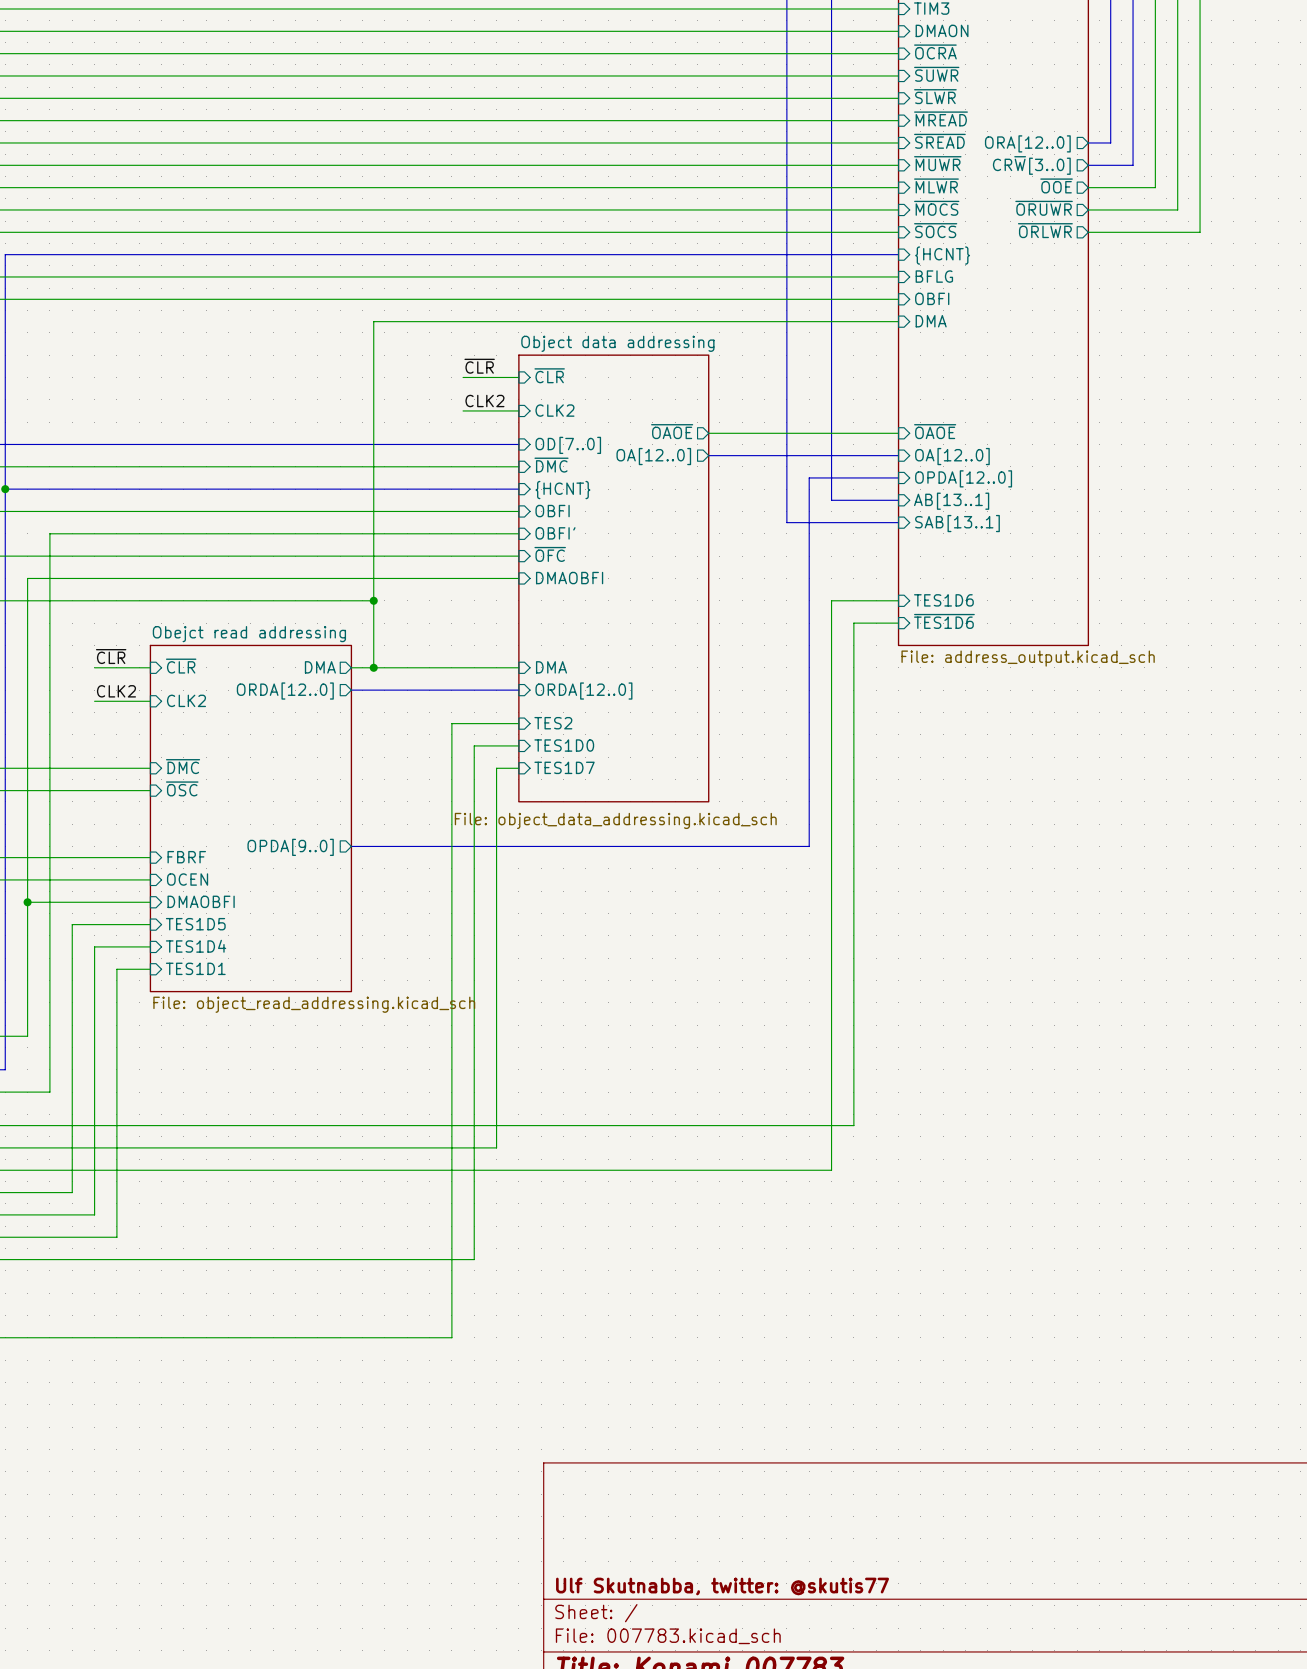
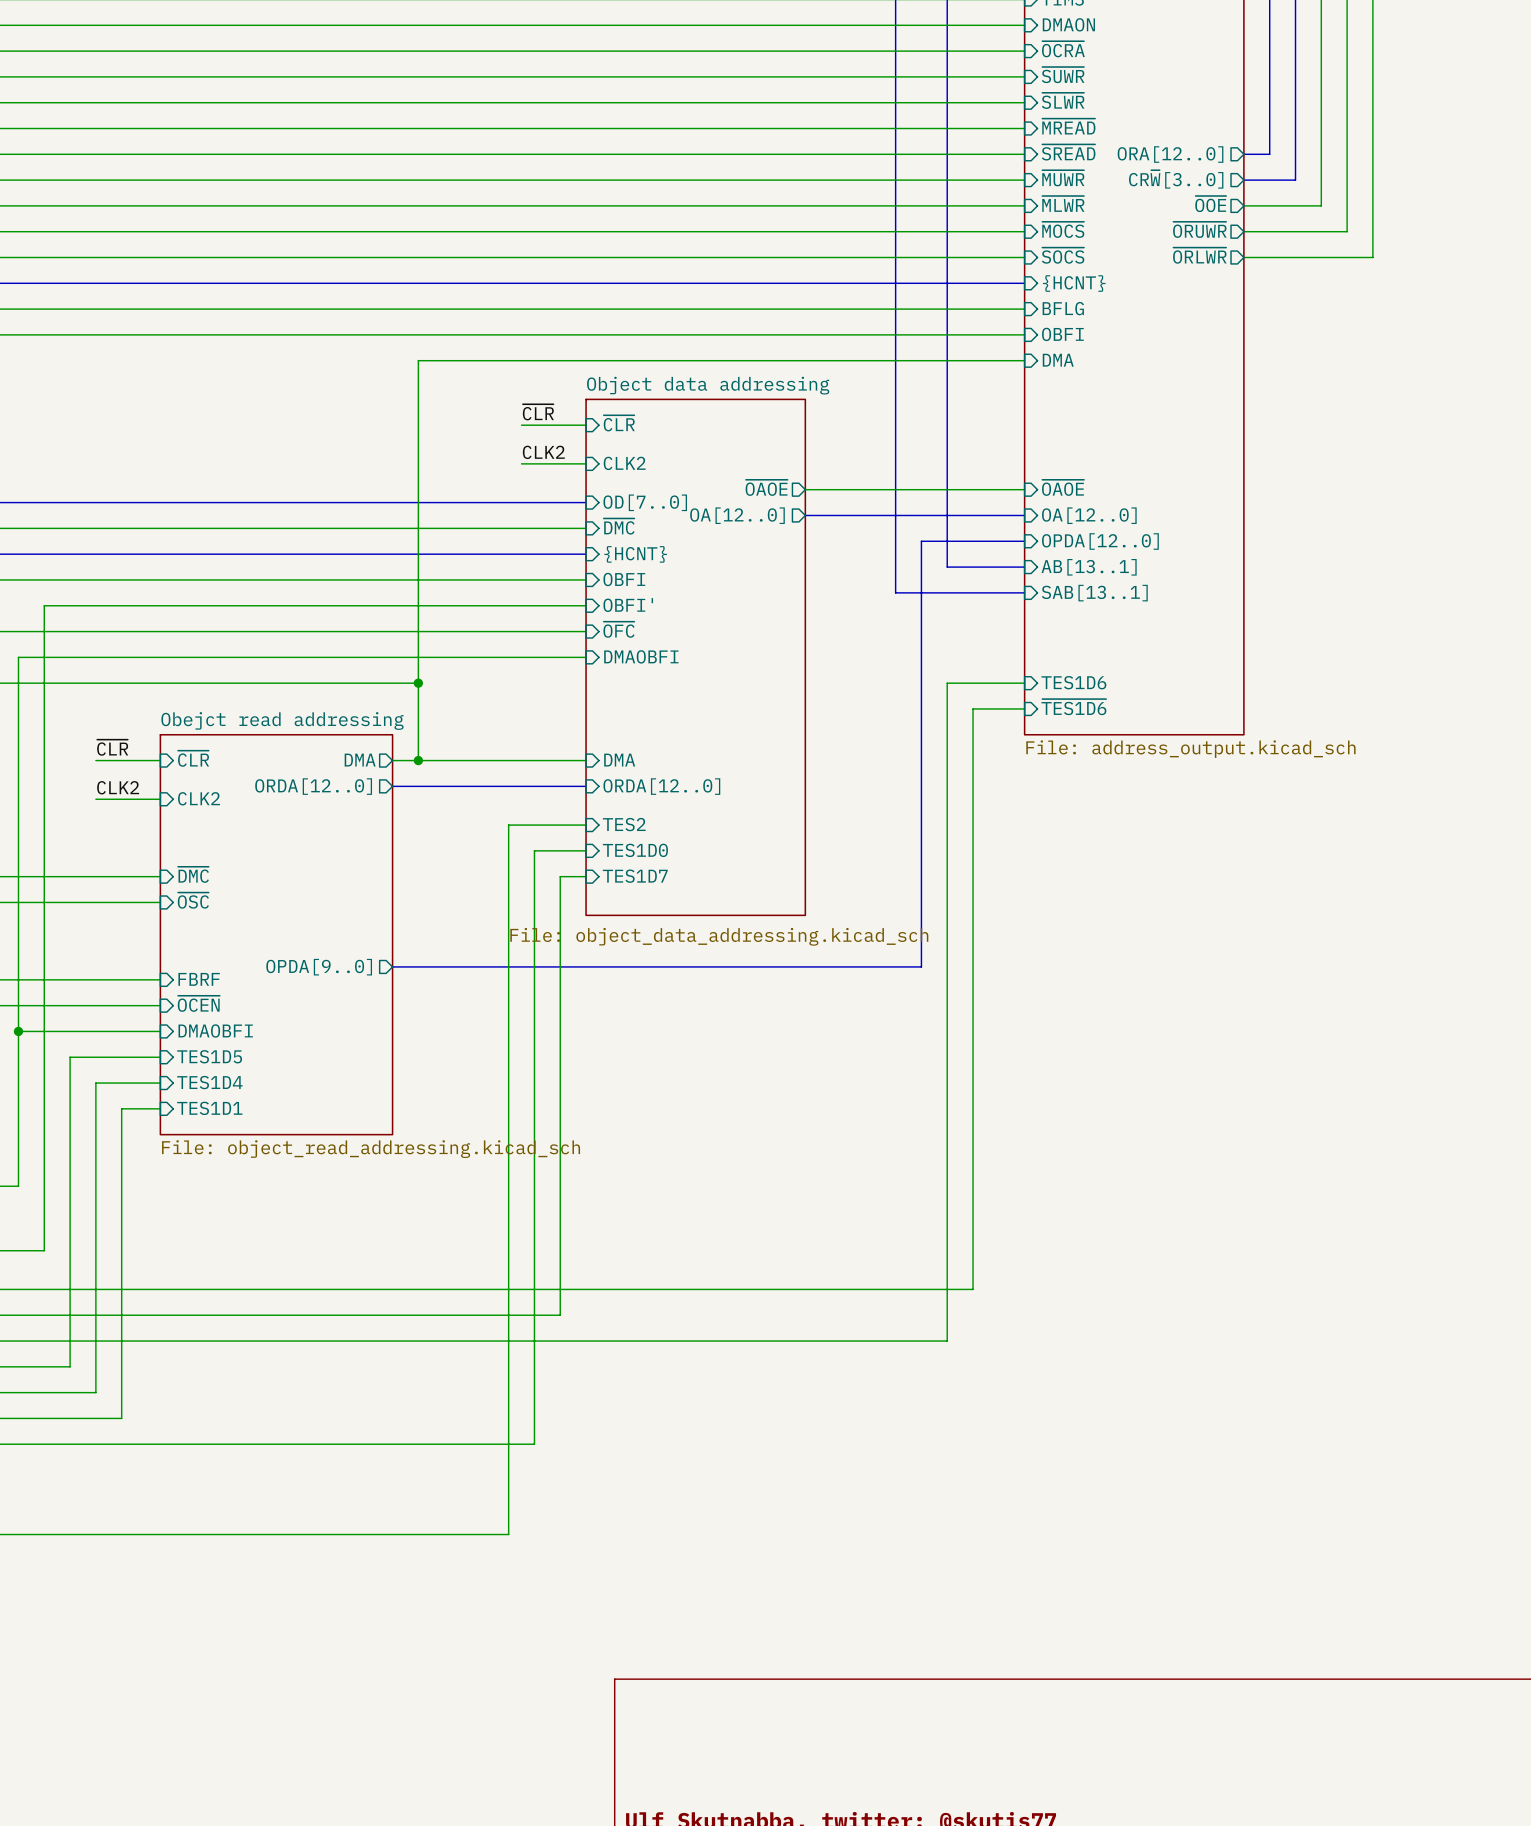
sheet pin: OCEN (187, 879) -> ~{OCEN} (198, 1003)

